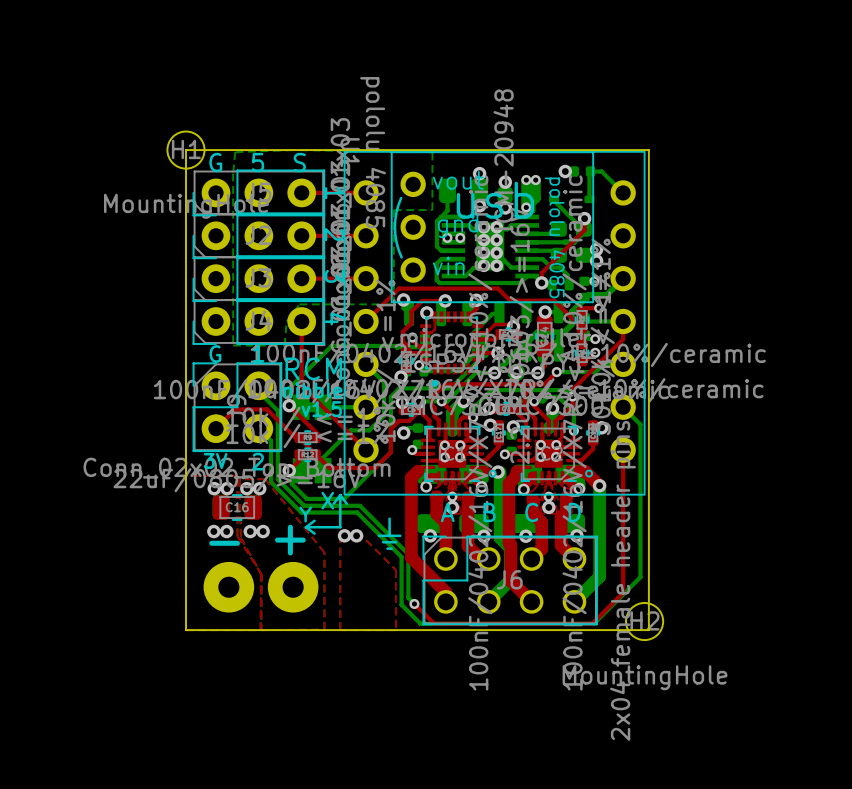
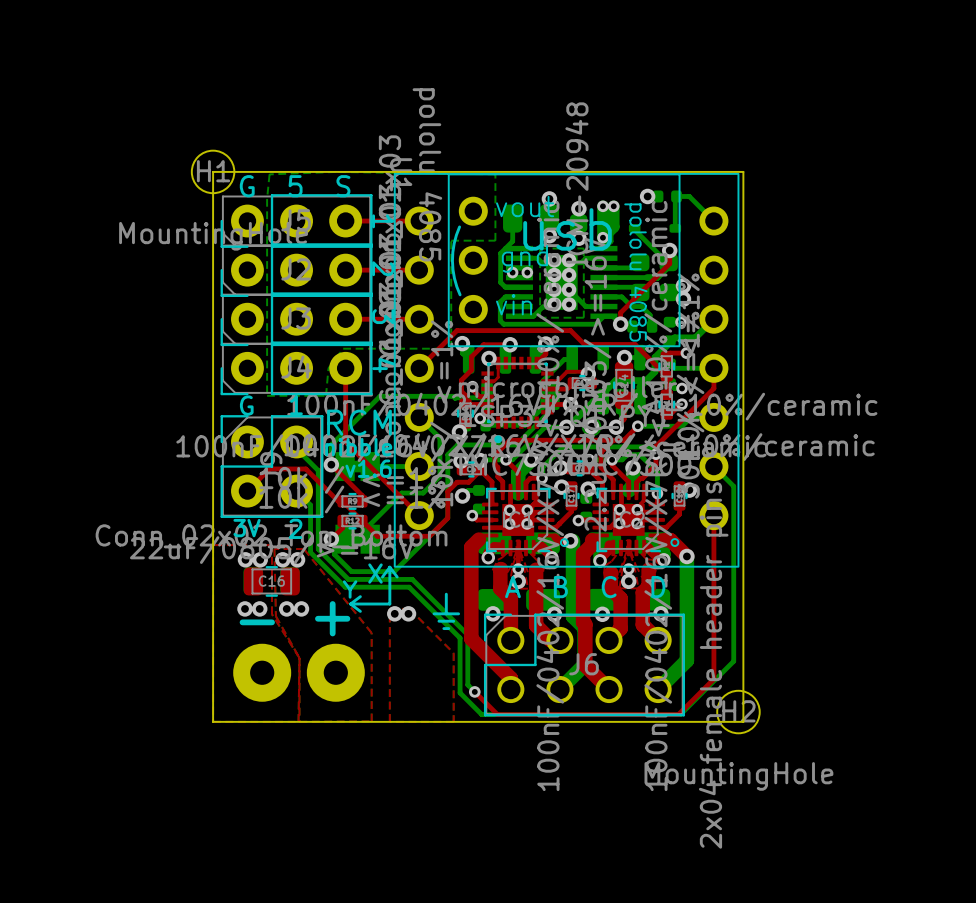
bottom zone outline: none -> (540, 248) (583, 248) (583, 317) (540, 317) (540, 248)
text: v1.5 (321, 409) -> v1.6 (368, 468)

